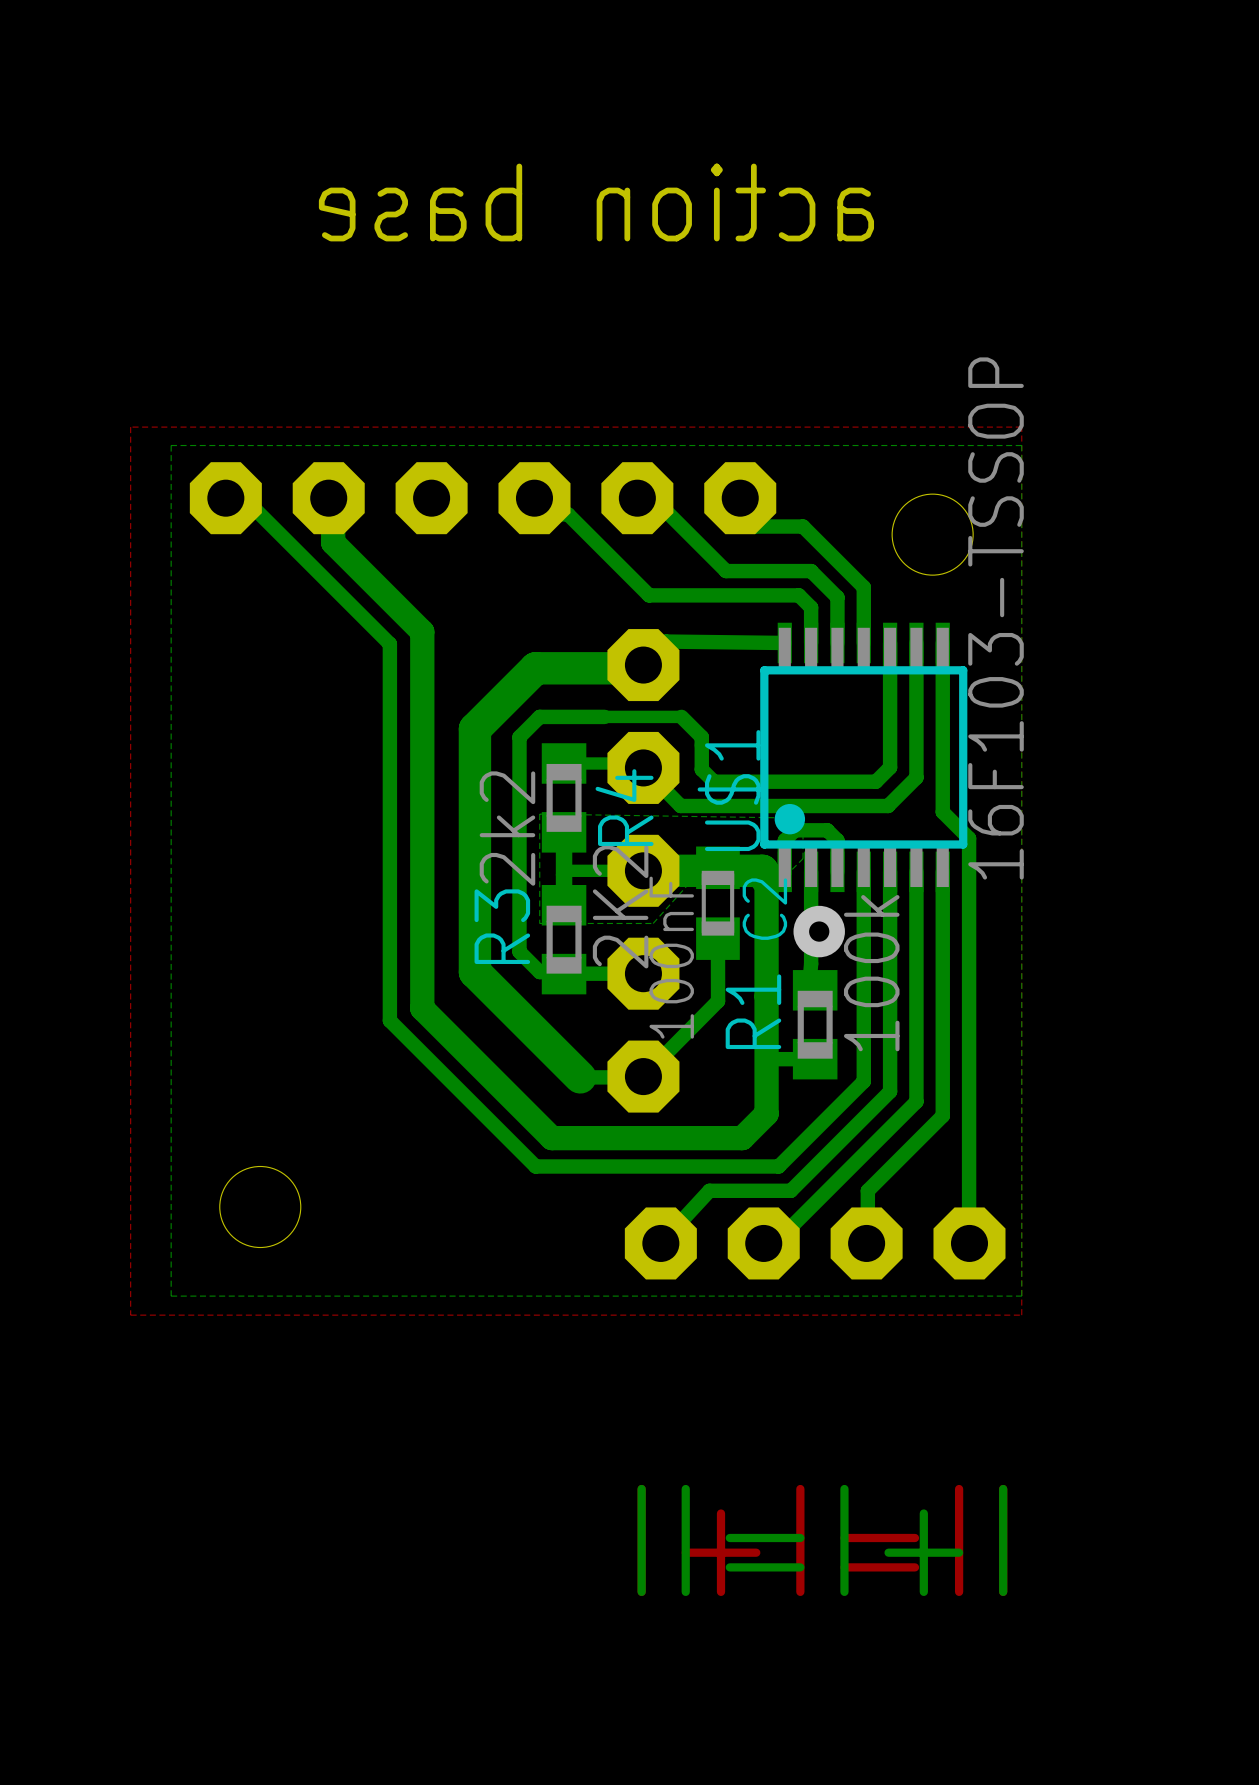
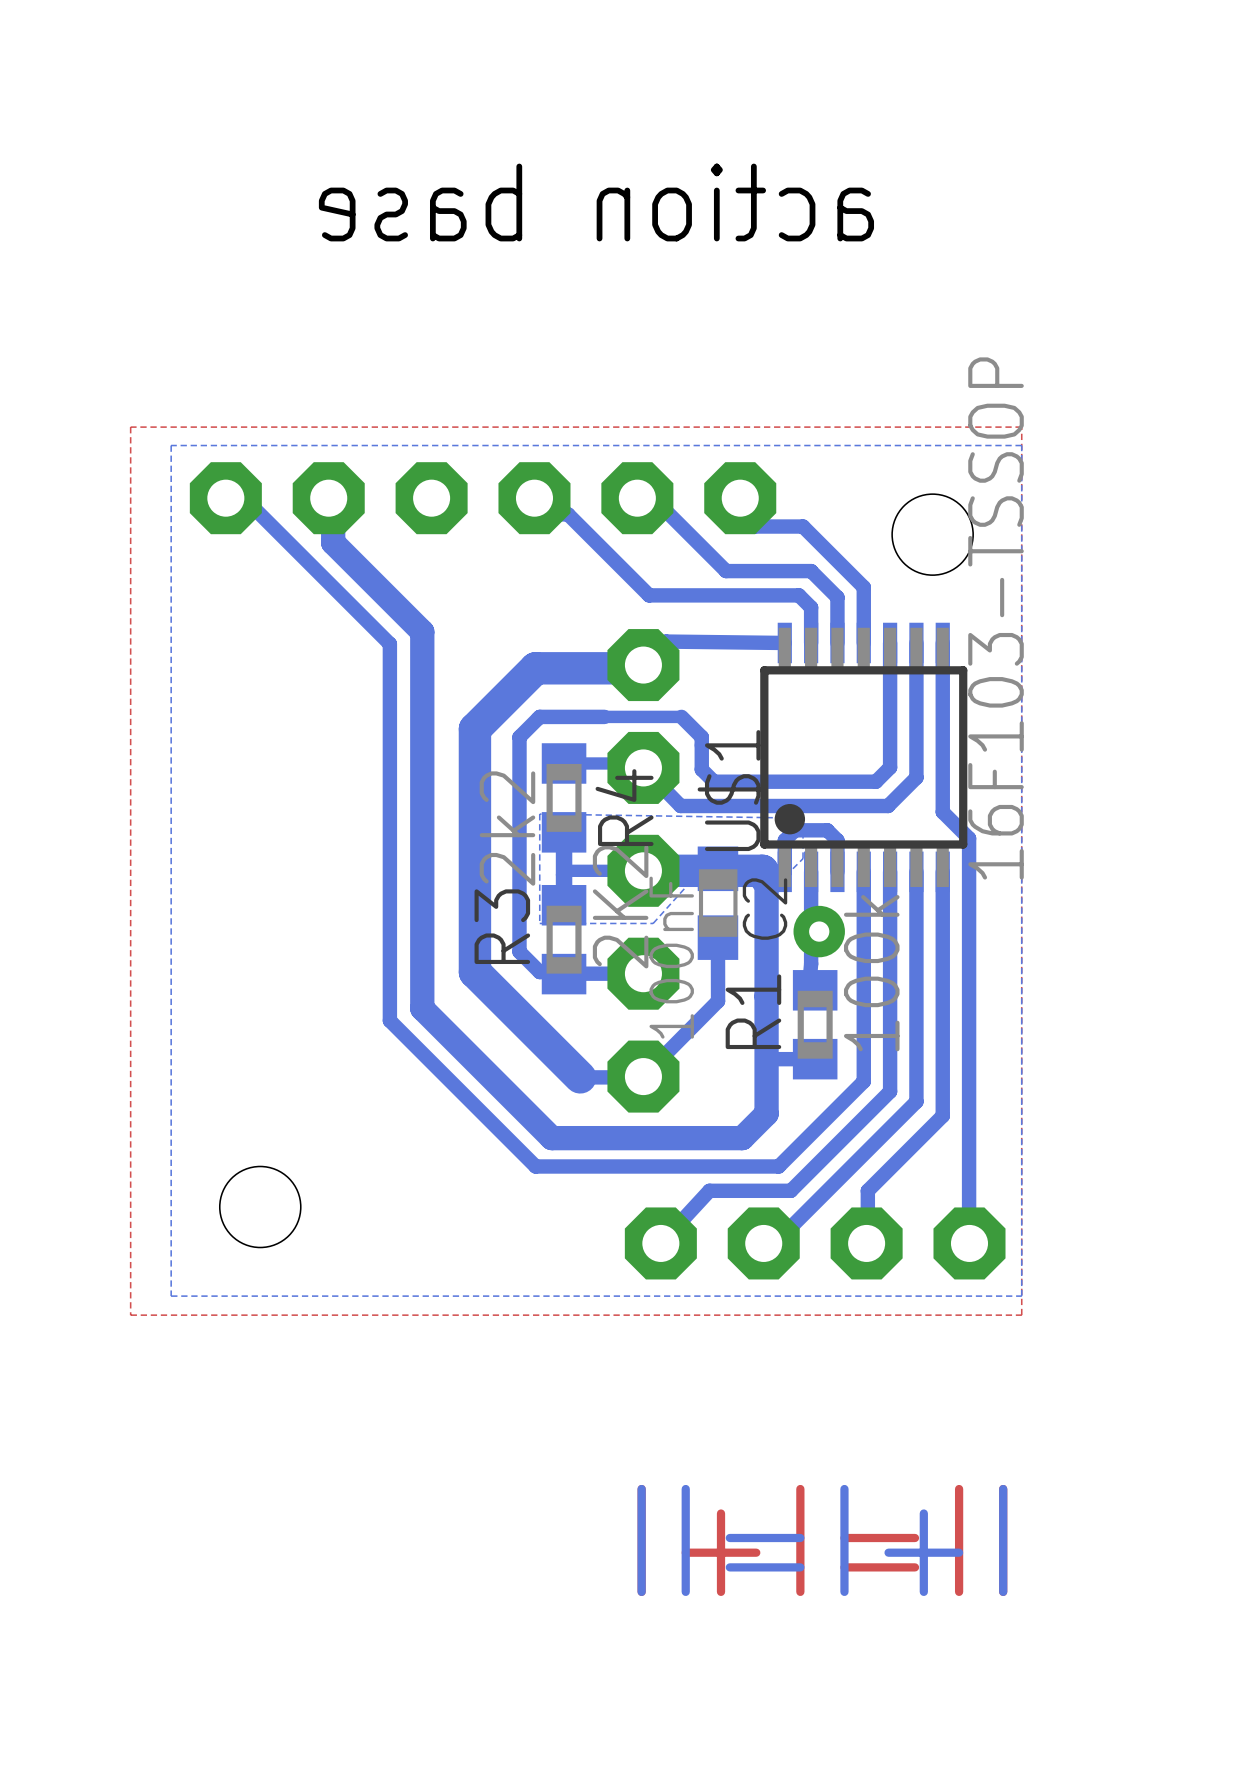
C2 footprint: [696, 846, 740, 960] -> [697, 846, 739, 960]

